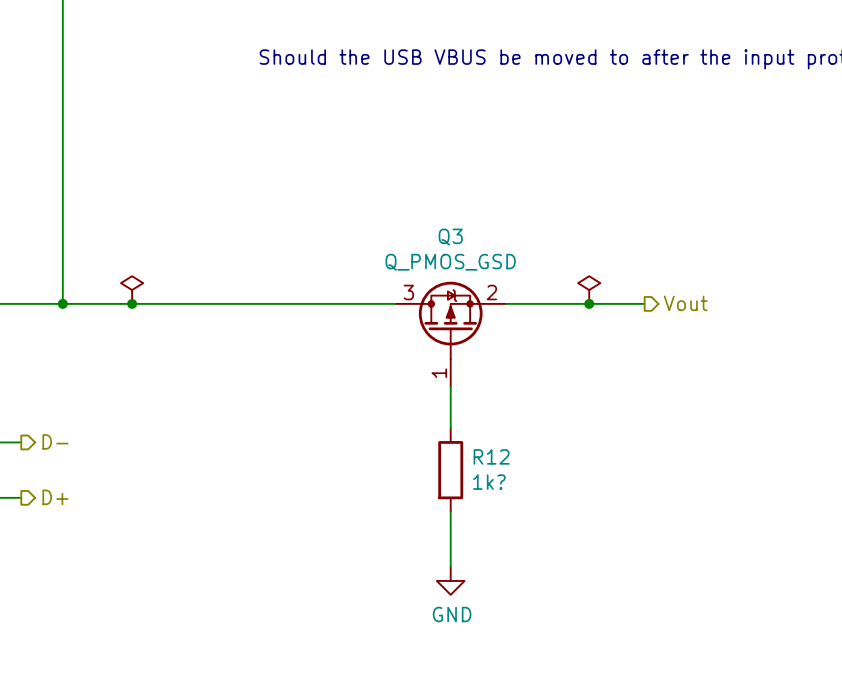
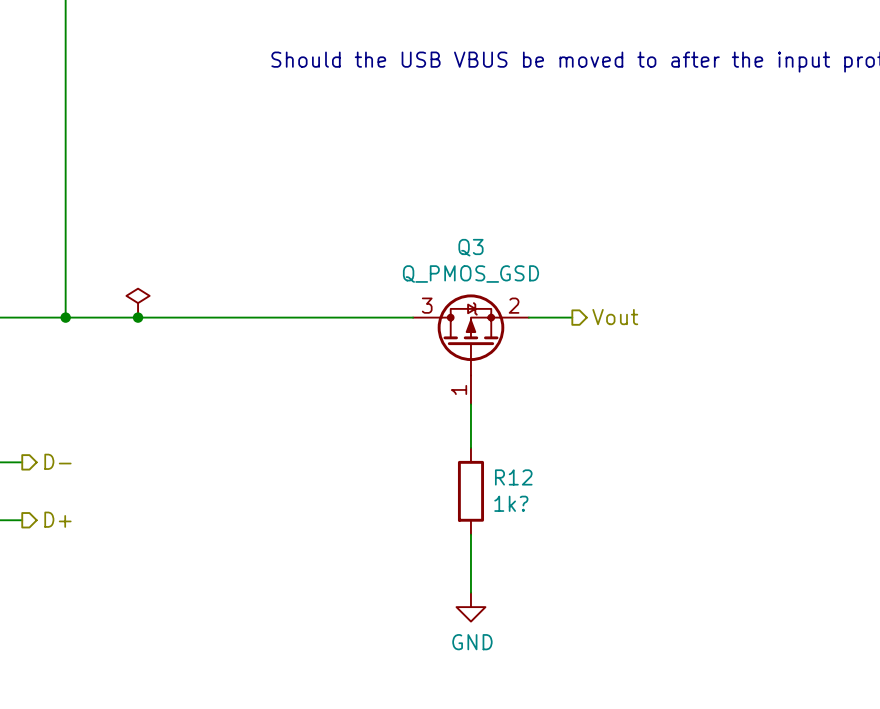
power symbol: (589, 290) -> none
wire: (547, 303) (644, 303) -> none
junction: (589, 303) -> none
hierarchical label position: Vout (685, 303) -> Vout (615, 317)

